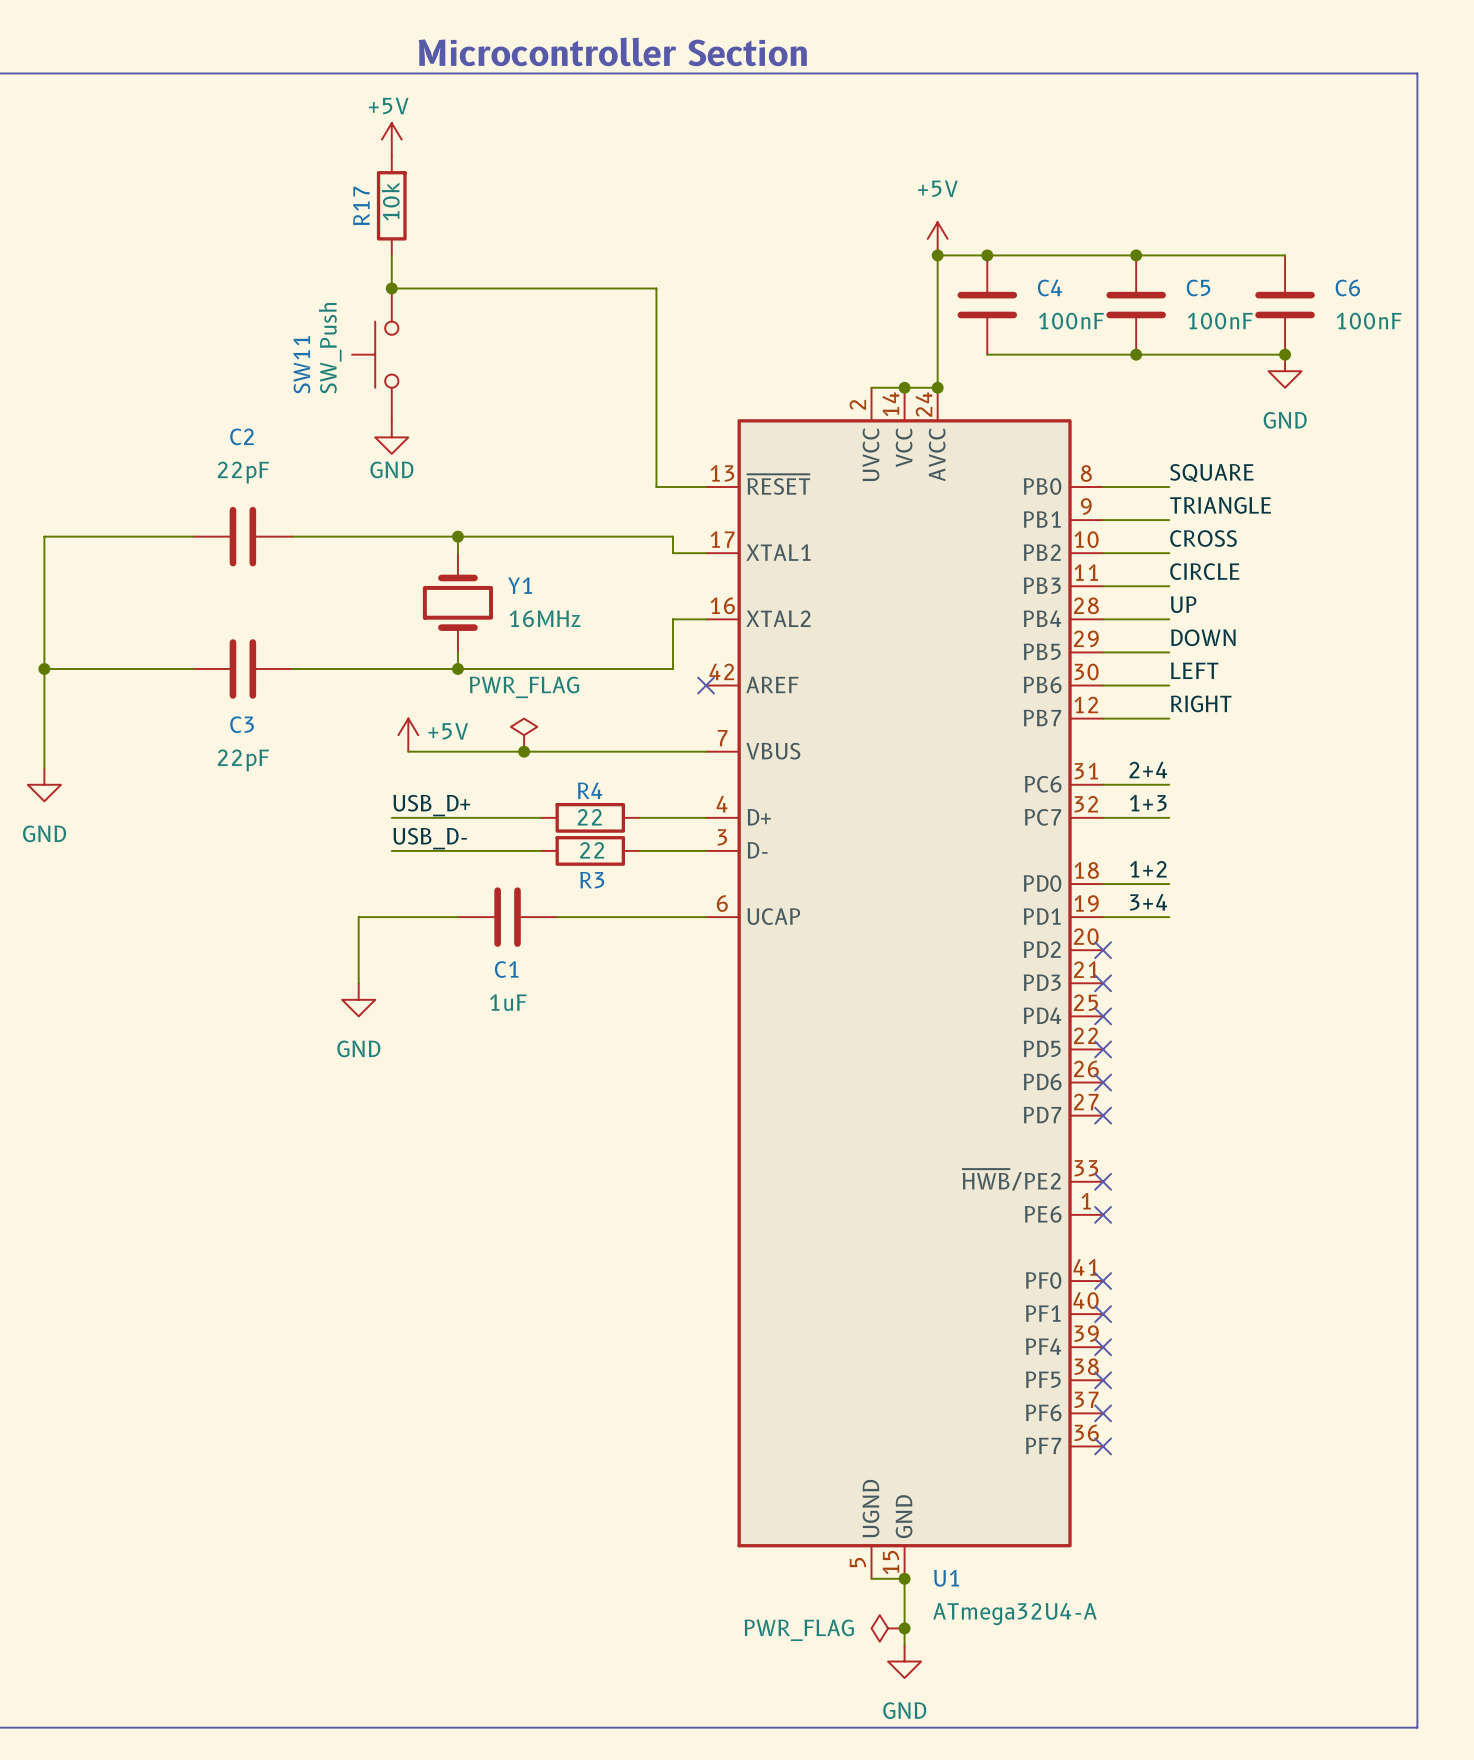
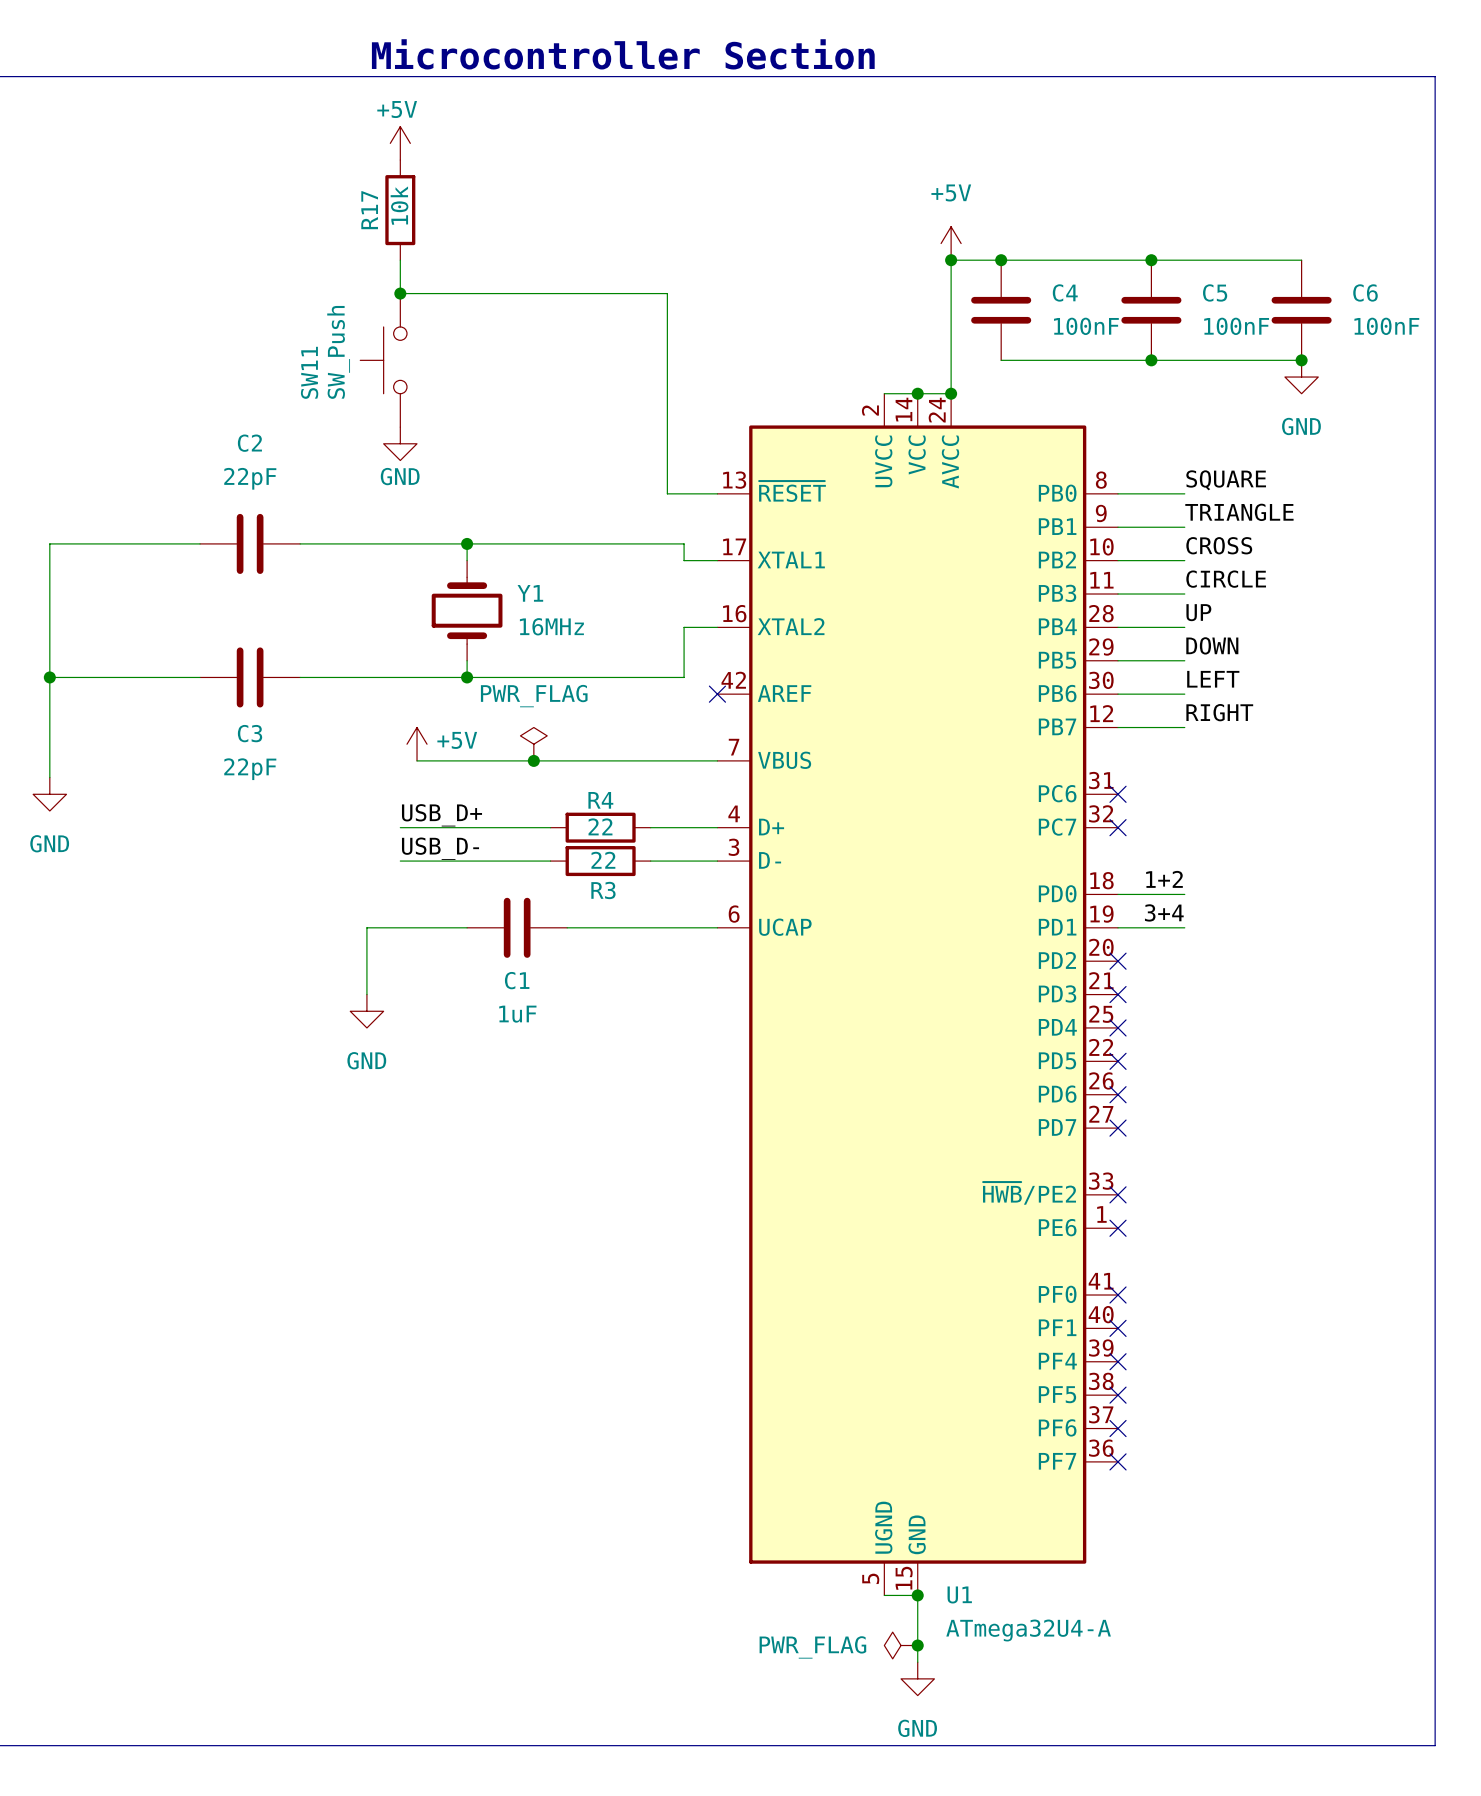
label: 2+4 (1148, 770) -> none
wire: (1103, 784) (1169, 784) -> none
no-connect mark: none -> (1118, 794)
label: 1+3 (1148, 803) -> none
wire: (1103, 817) (1169, 817) -> none
no-connect mark: none -> (1118, 827)

